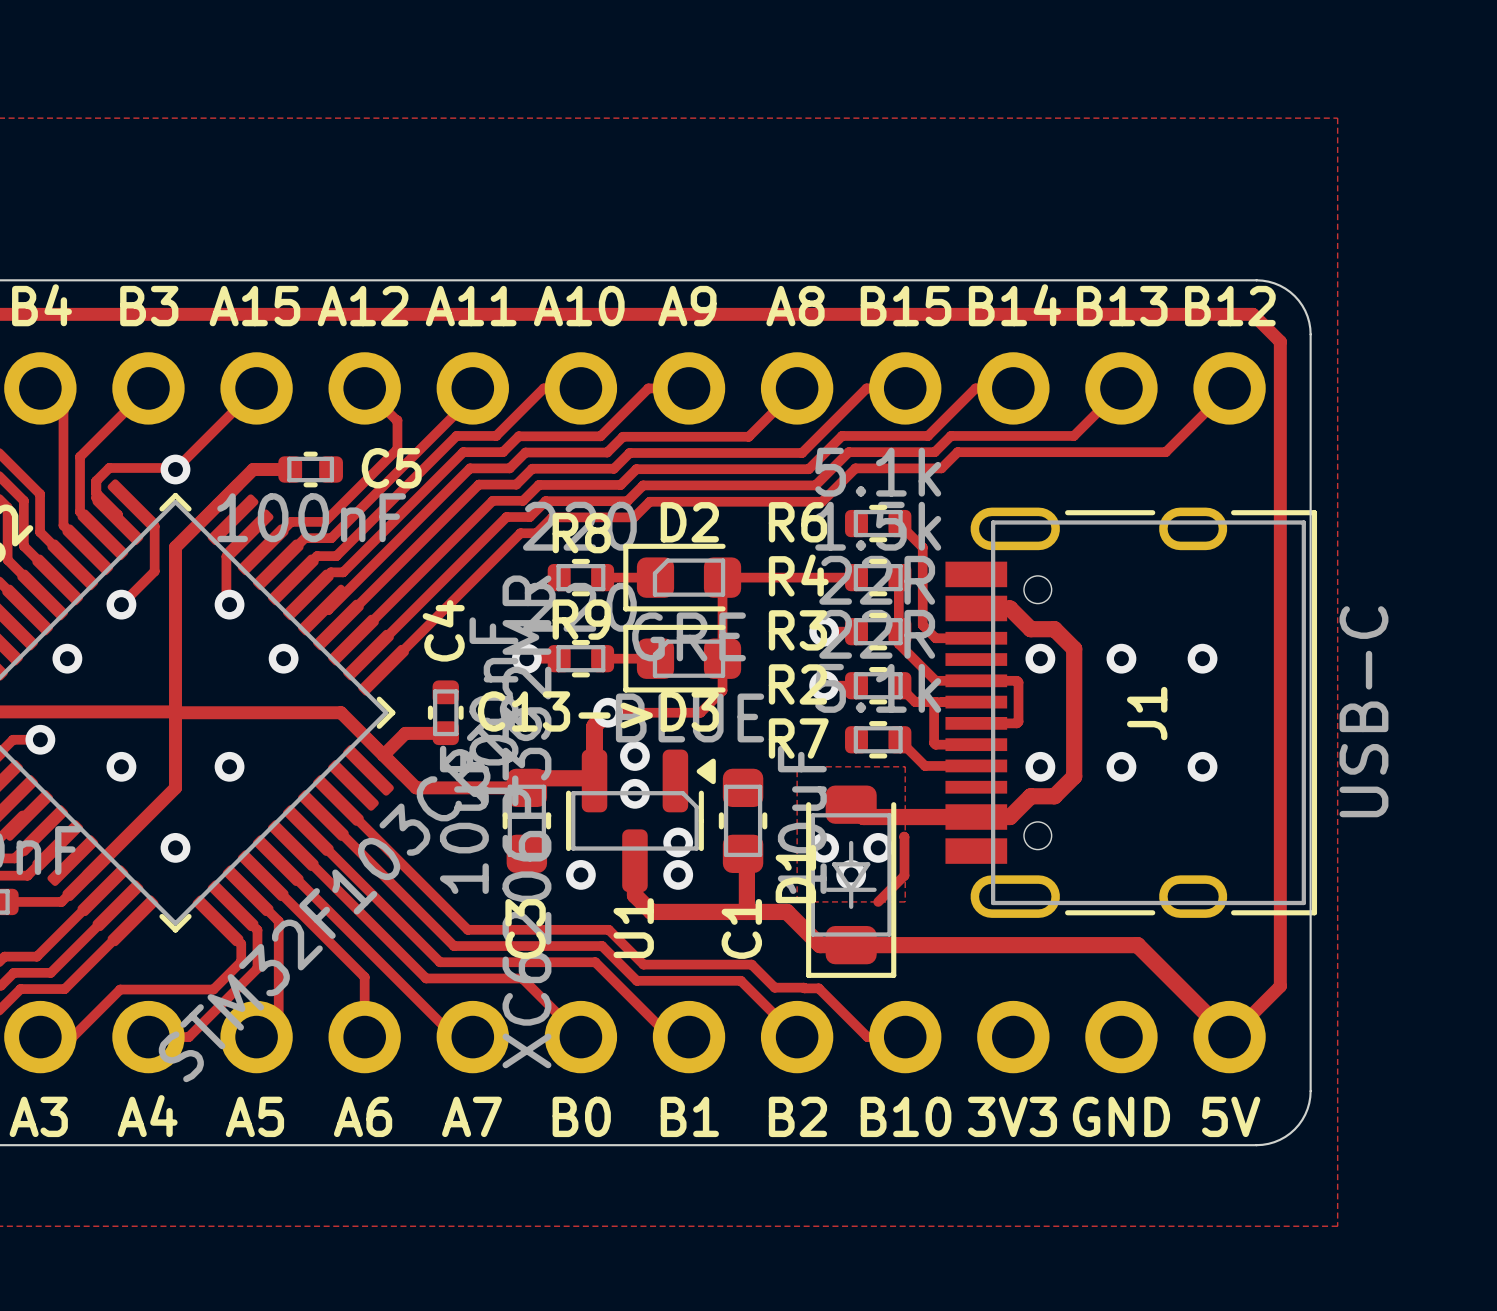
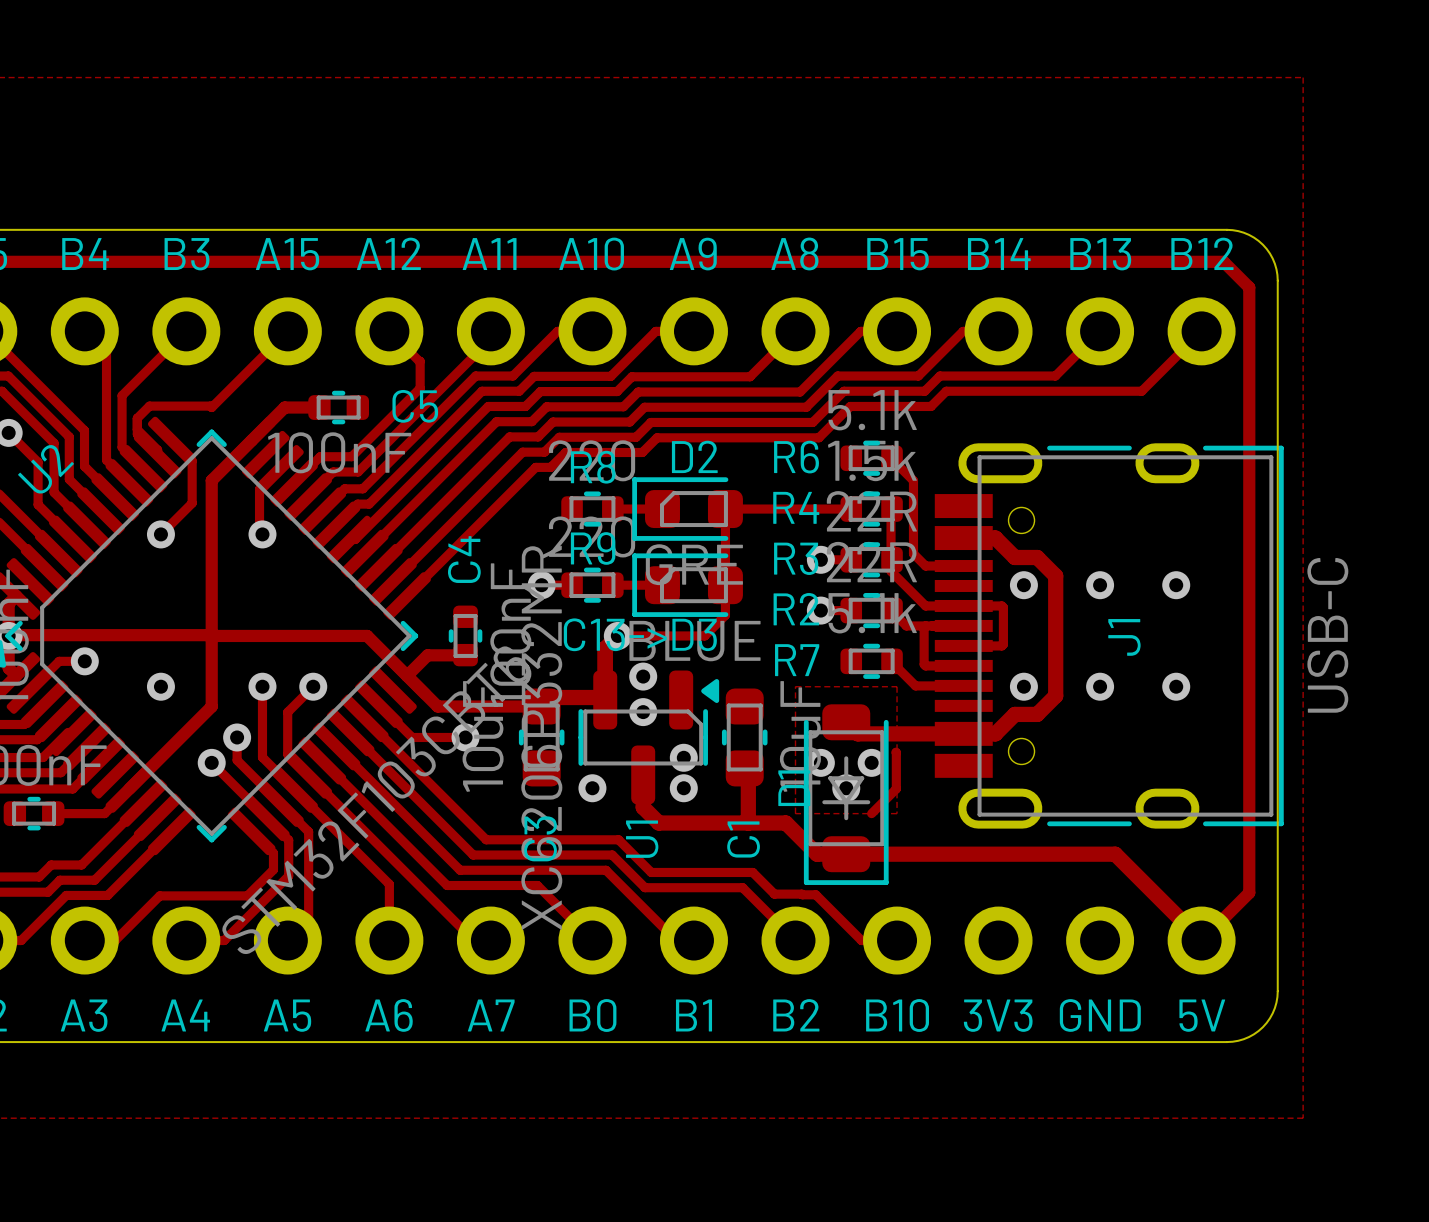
via: (175, 469) -> none
via: (67, 658) -> none
via: (283, 658) -> none
track: none -> (262, 686) (262, 757) (294, 788)
track: none -> (313, 686) (287, 712) (287, 754) (308, 774)
via: none -> (313, 686)
track: none -> (378, 704) (412, 737) (465, 737)
track: none -> (237, 737) (237, 760) (279, 803)
via: none -> (237, 737)
via: none -> (465, 737)
track: none -> (211, 762) (265, 816)

